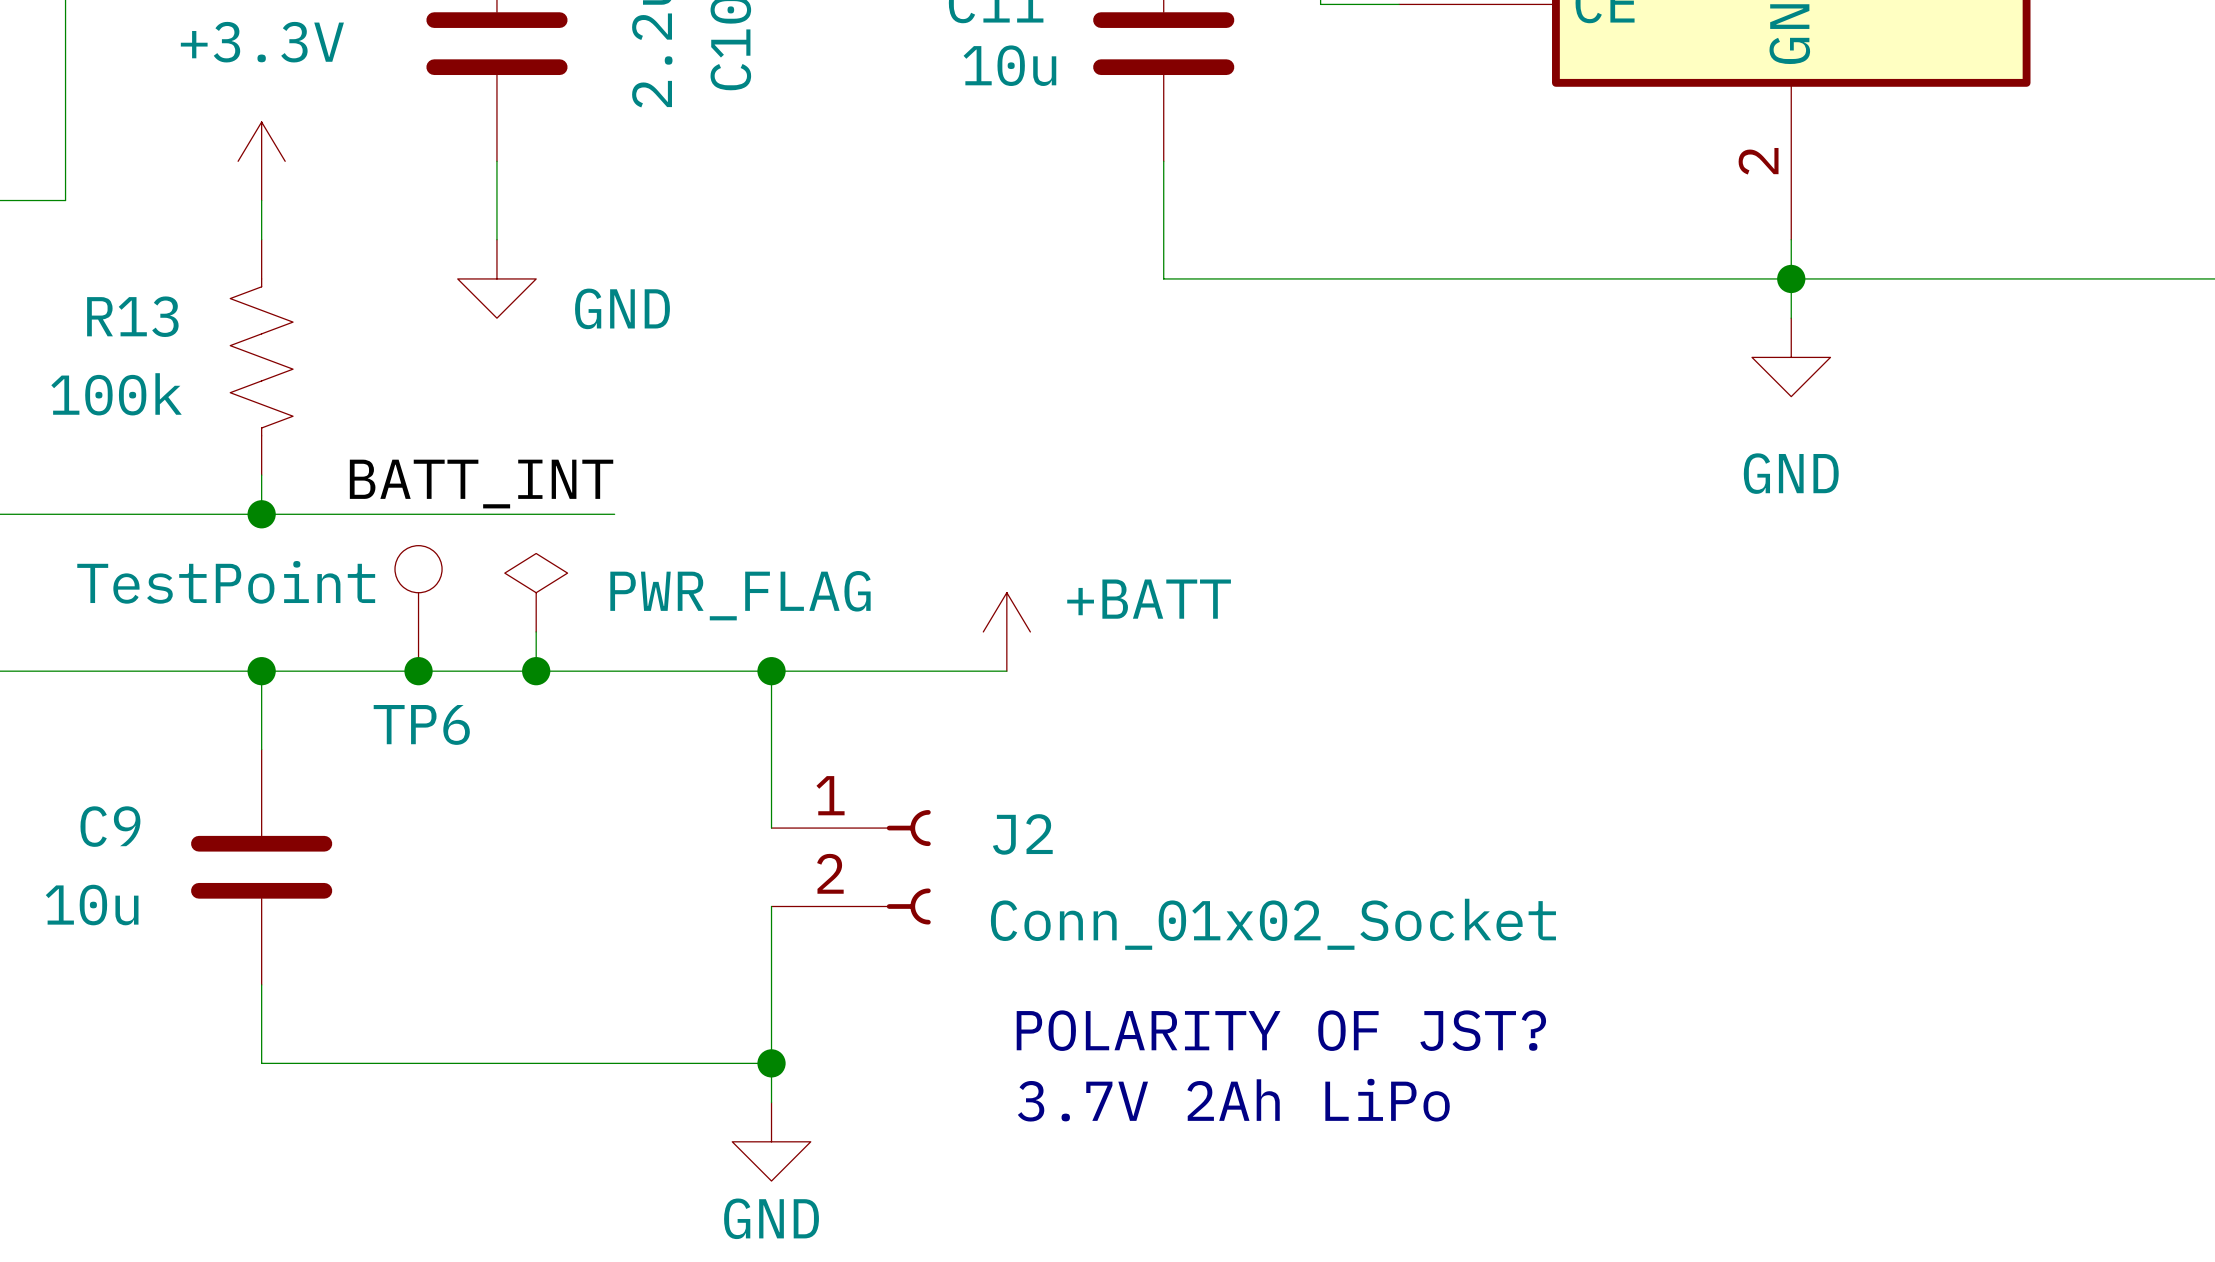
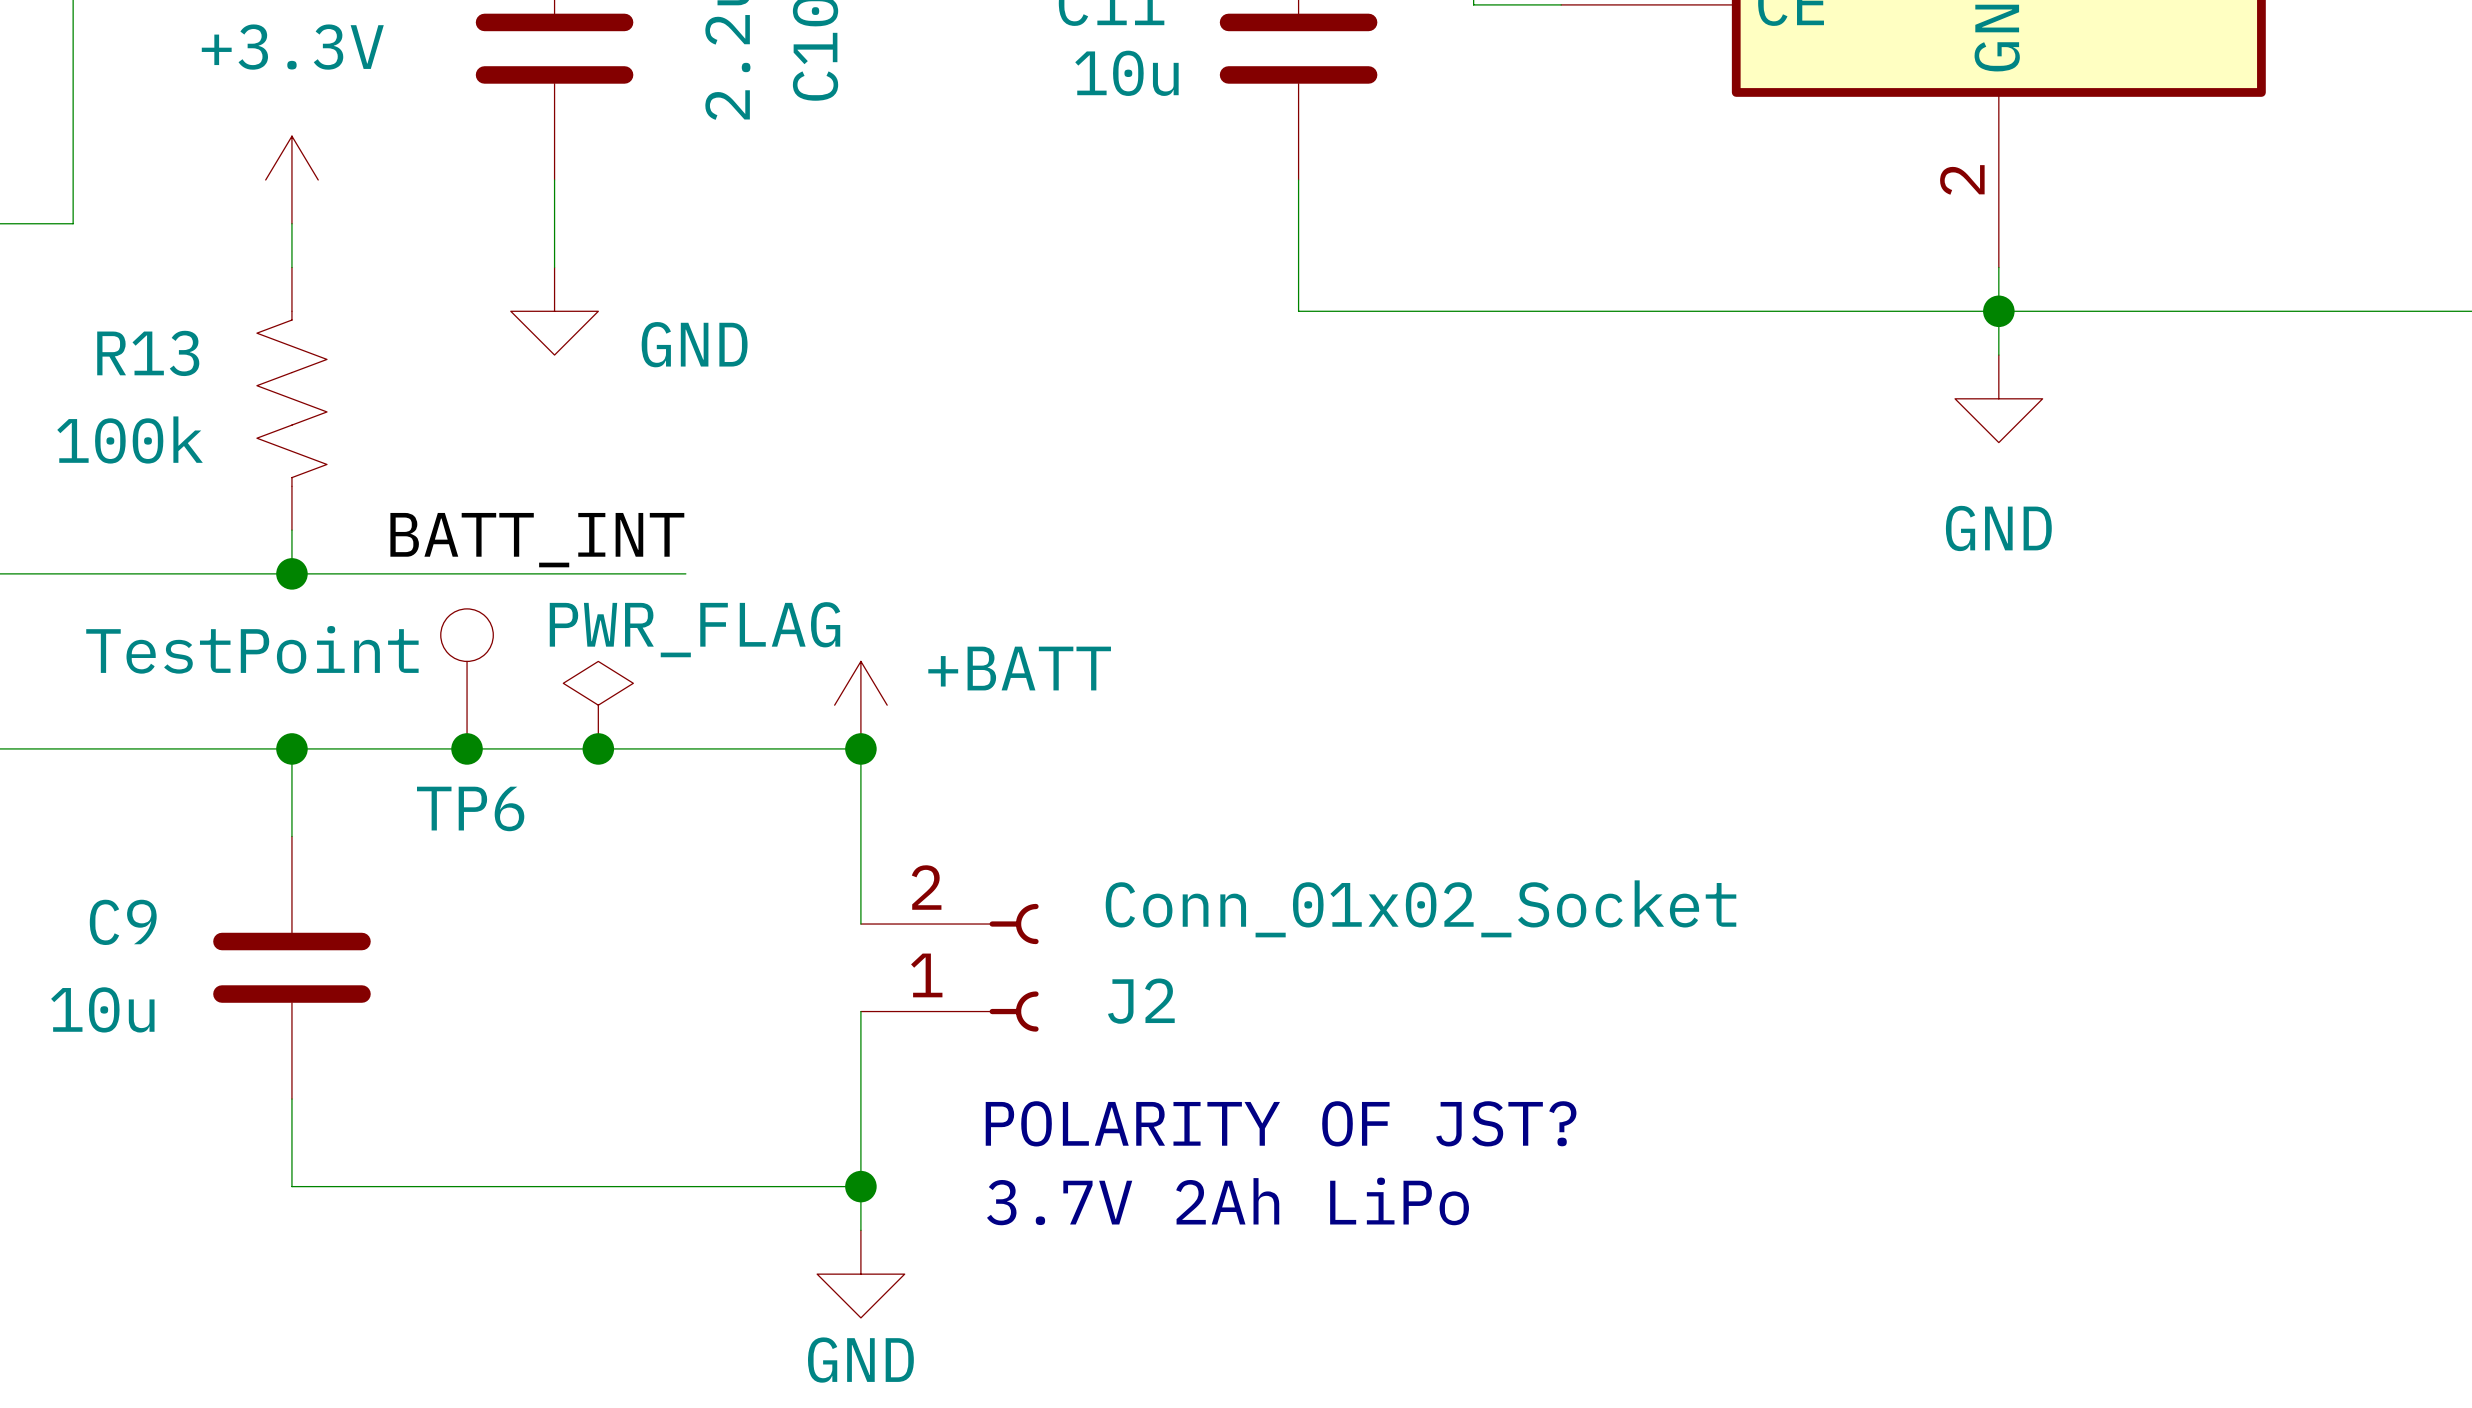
power symbol position: PWR_FLAG (536, 592) -> PWR_FLAG (598, 705)
power symbol text position: PWR_FLAG (740, 595) -> PWR_FLAG (694, 629)
power symbol position: +BATT (1006, 631) -> +BATT (860, 705)
wire: (771, 671) (1006, 671) -> none
J2 flip: as is (908, 867) -> up-down (1014, 967)
text position: POLARITY OF JST? (1281, 1030) -> POLARITY OF JST? (1281, 1123)
text position: 3.7V 2Ah LiPo (1233, 1100) -> 3.7V 2Ah LiPo (1227, 1201)

